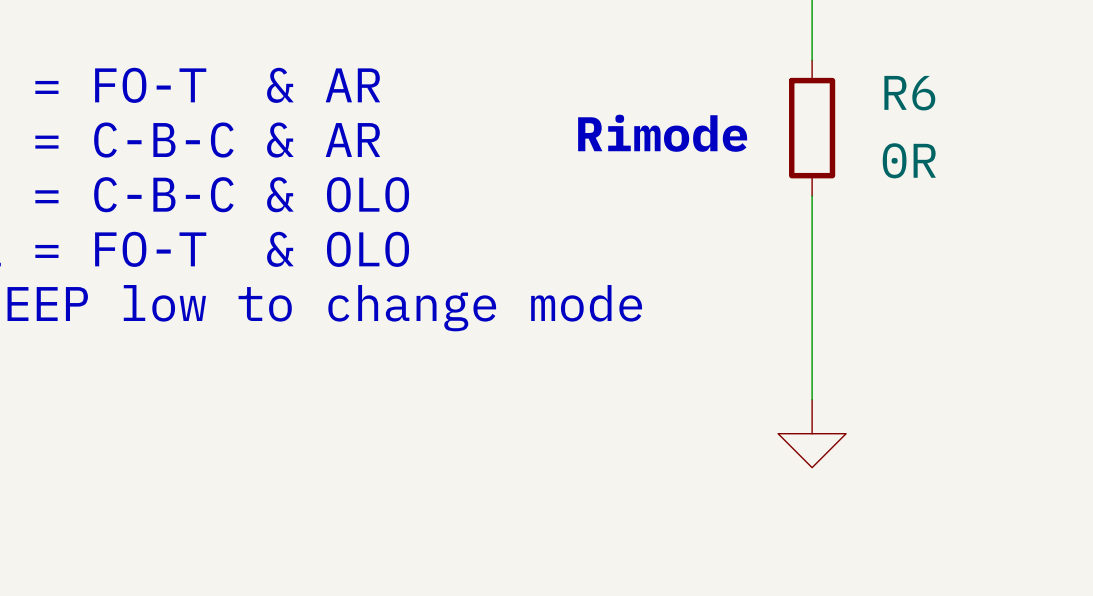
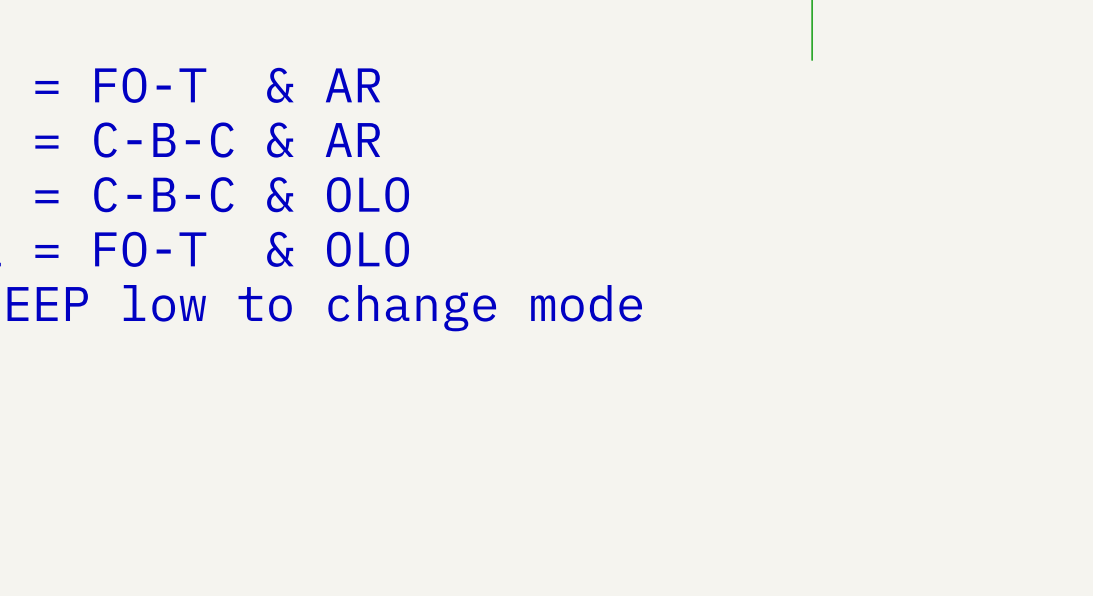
R6: 0R (812, 128) -> none
text: Rimode (662, 133) -> none
wire: (812, 196) (812, 399) -> none
power symbol: (812, 433) -> none

